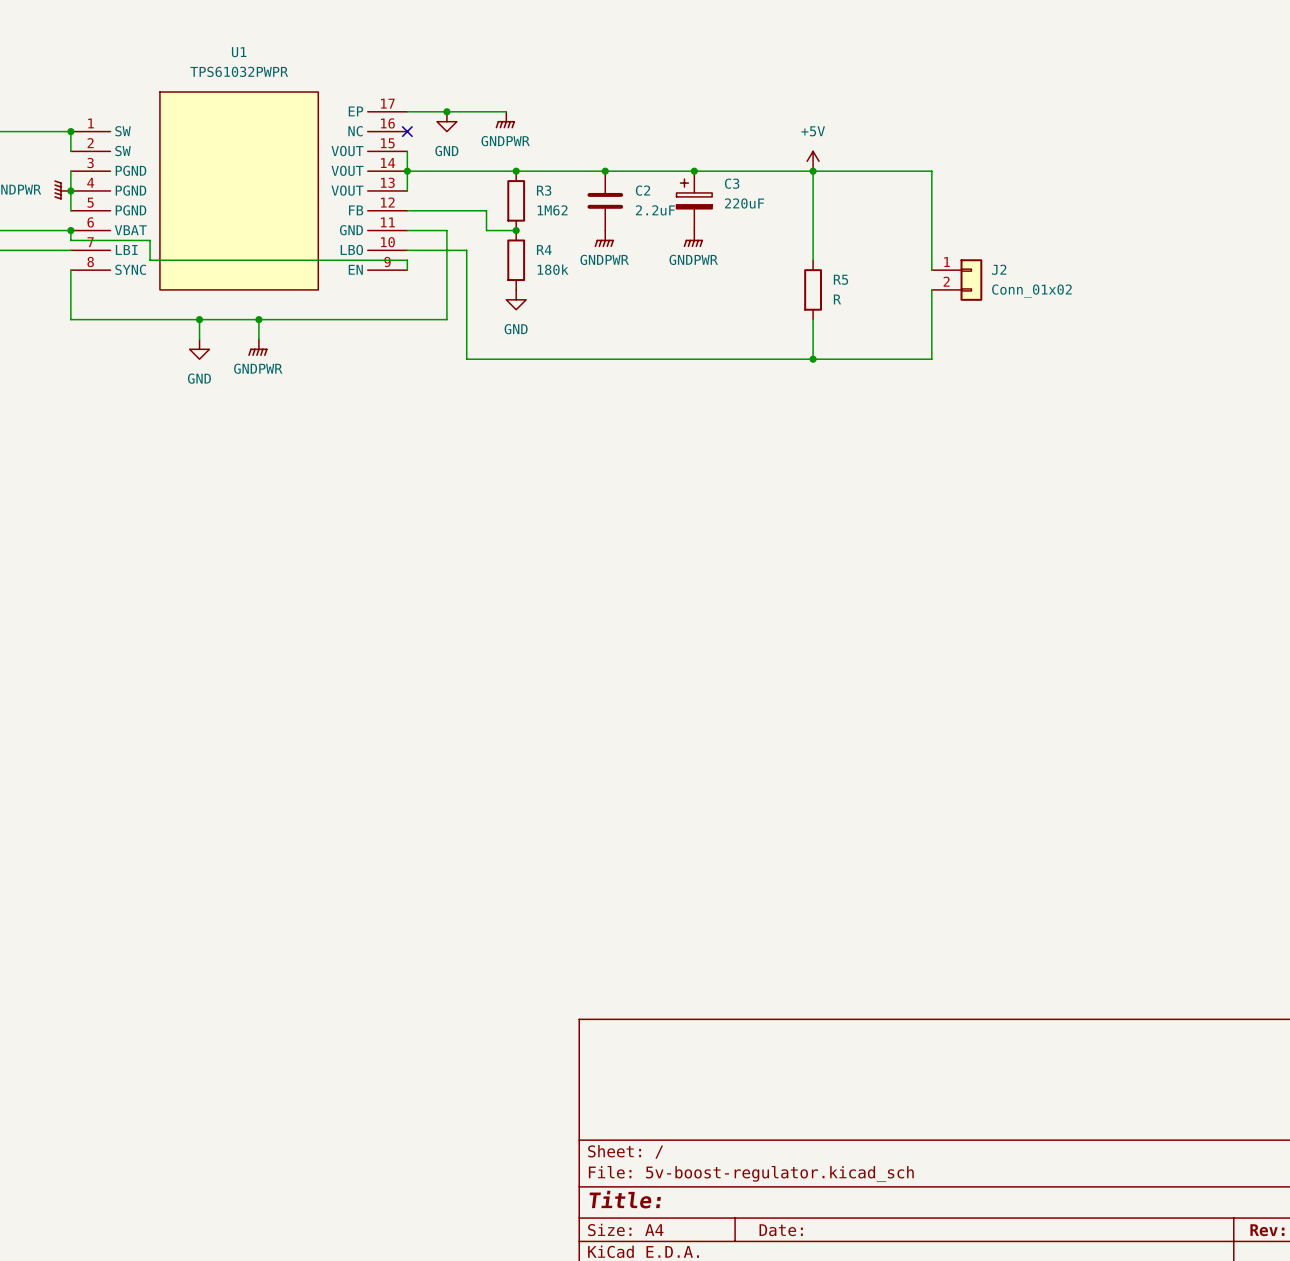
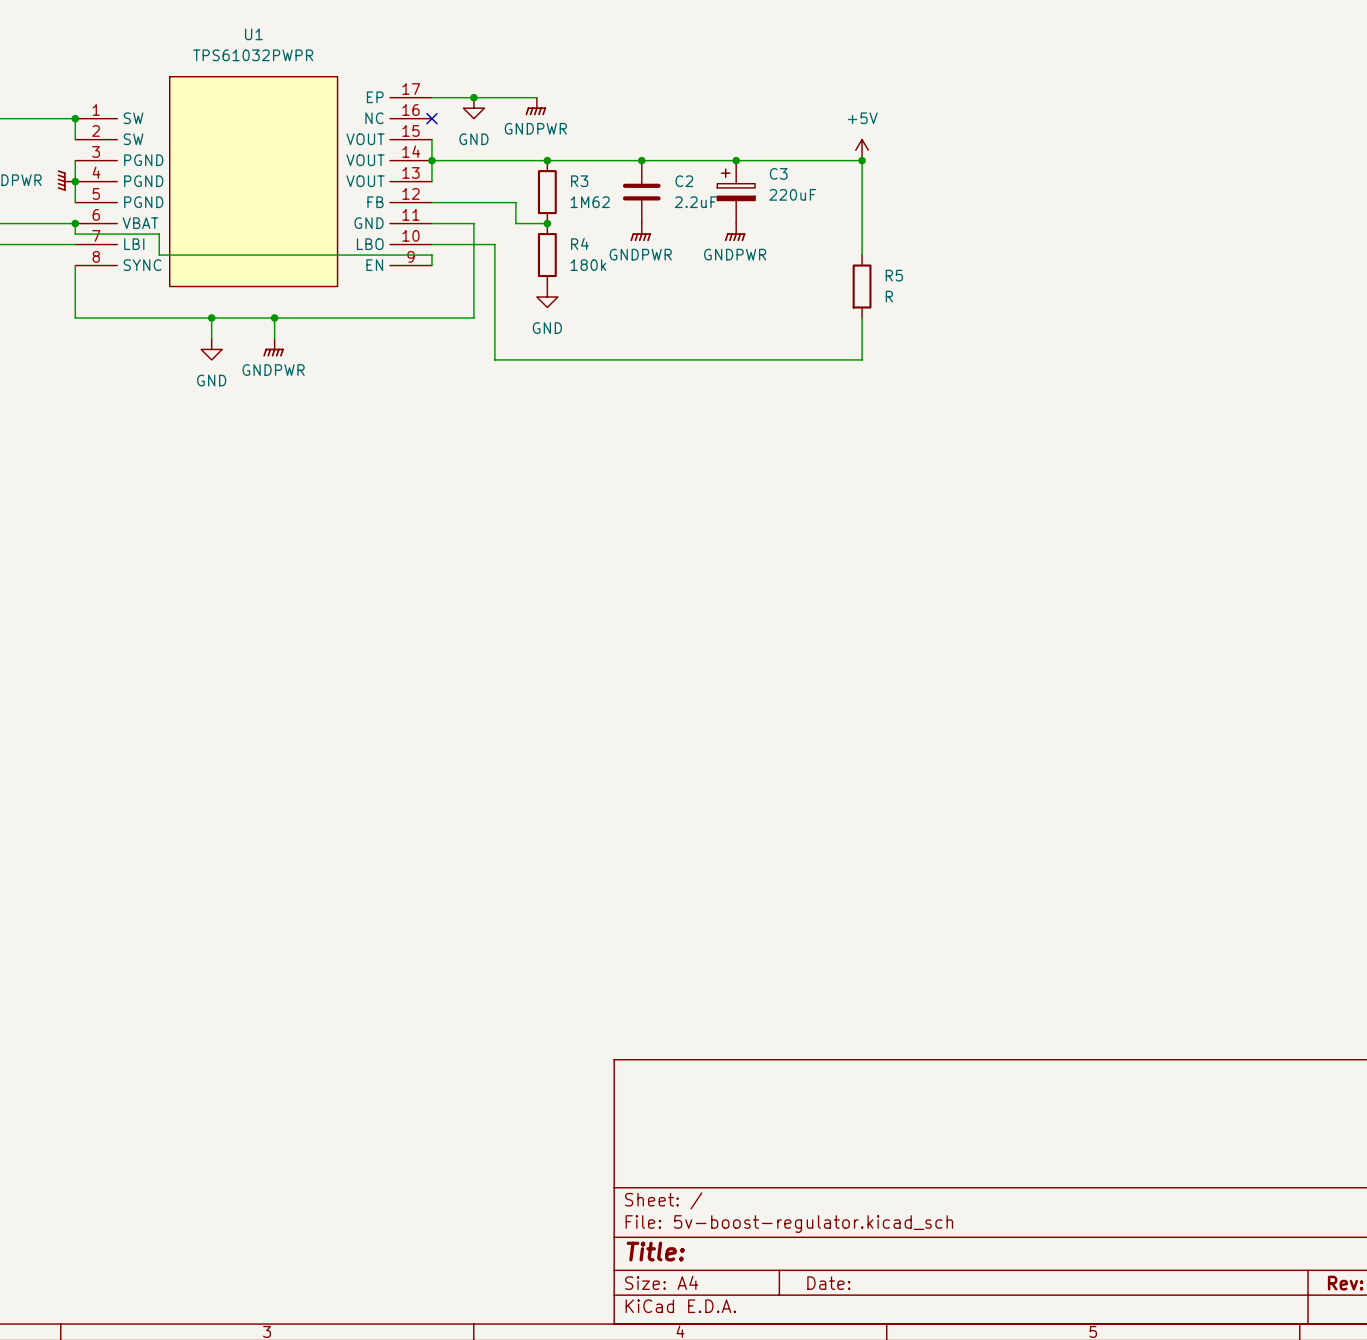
wire: (813, 171) (931, 171) (931, 270) -> none
J2: Conn_01x02 (957, 280) -> none
wire: (931, 289) (931, 359) (813, 359) -> none
junction: (813, 359) -> none

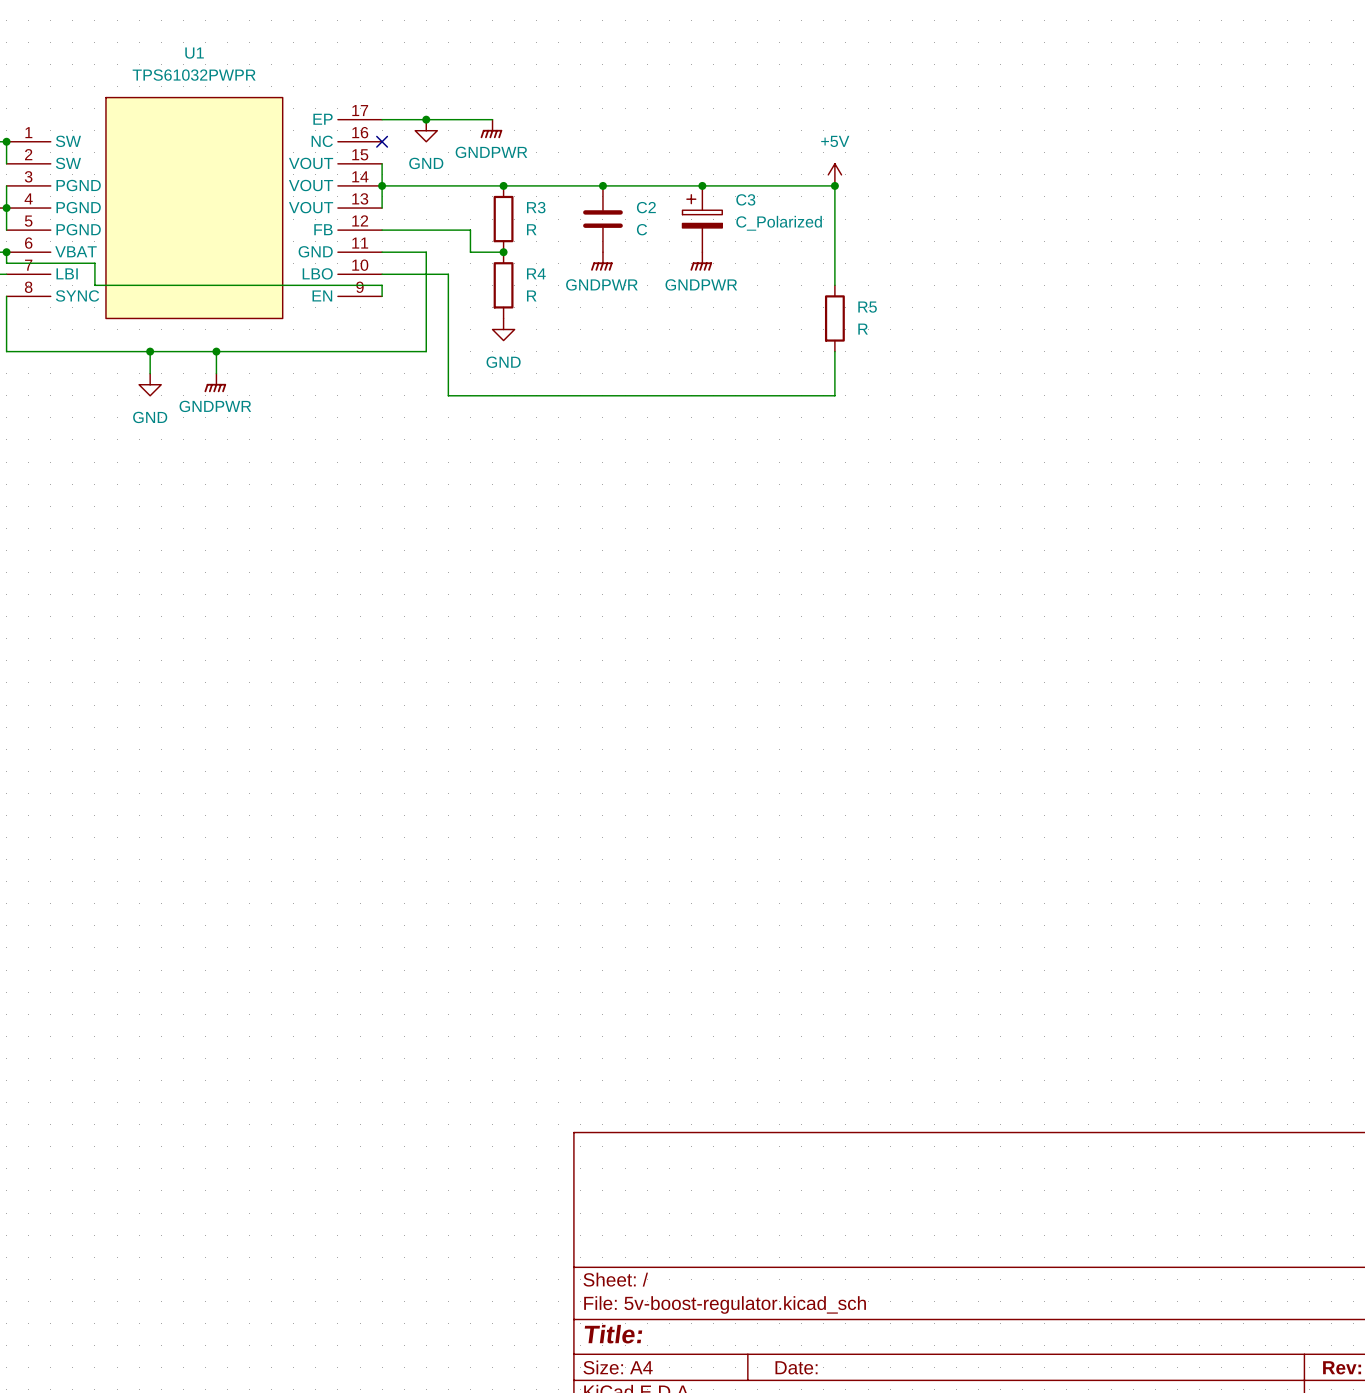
C3 value: 220uF (792, 194) -> C_Polarized (779, 223)
R3 value: 1M62 (590, 202) -> R (531, 229)
C2 value: 2.2uF (695, 202) -> C (642, 229)
R4 value: 180k (588, 265) -> R (531, 295)

